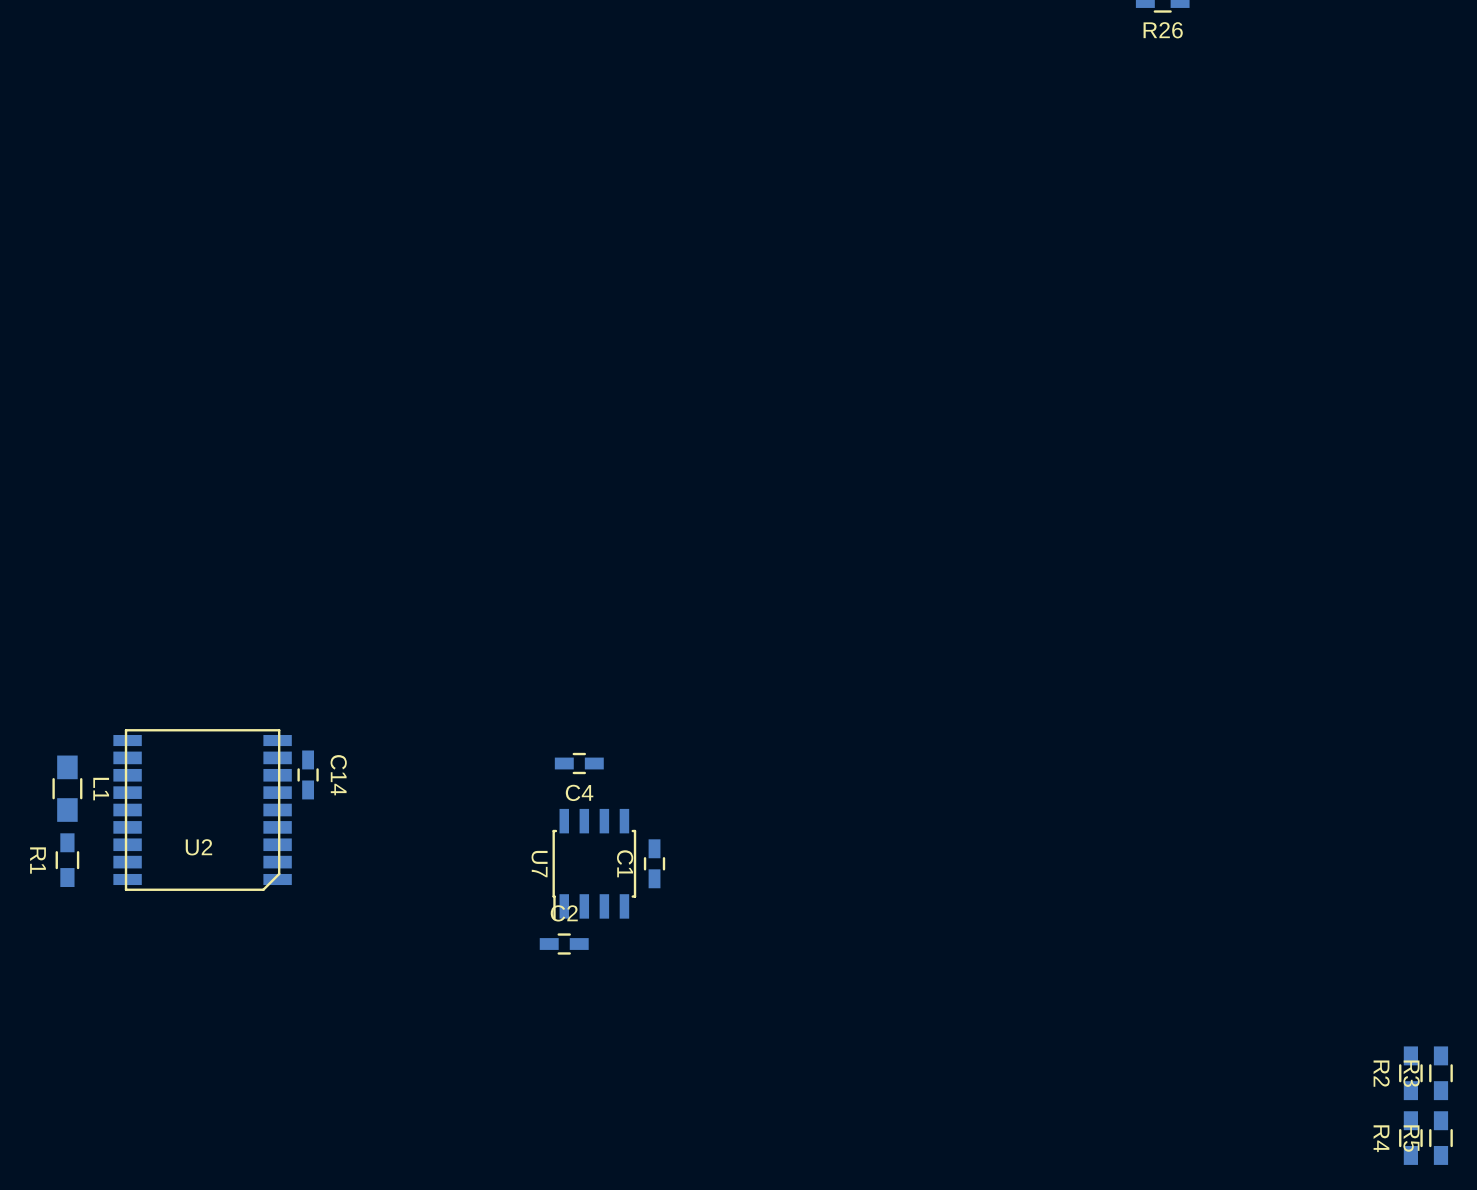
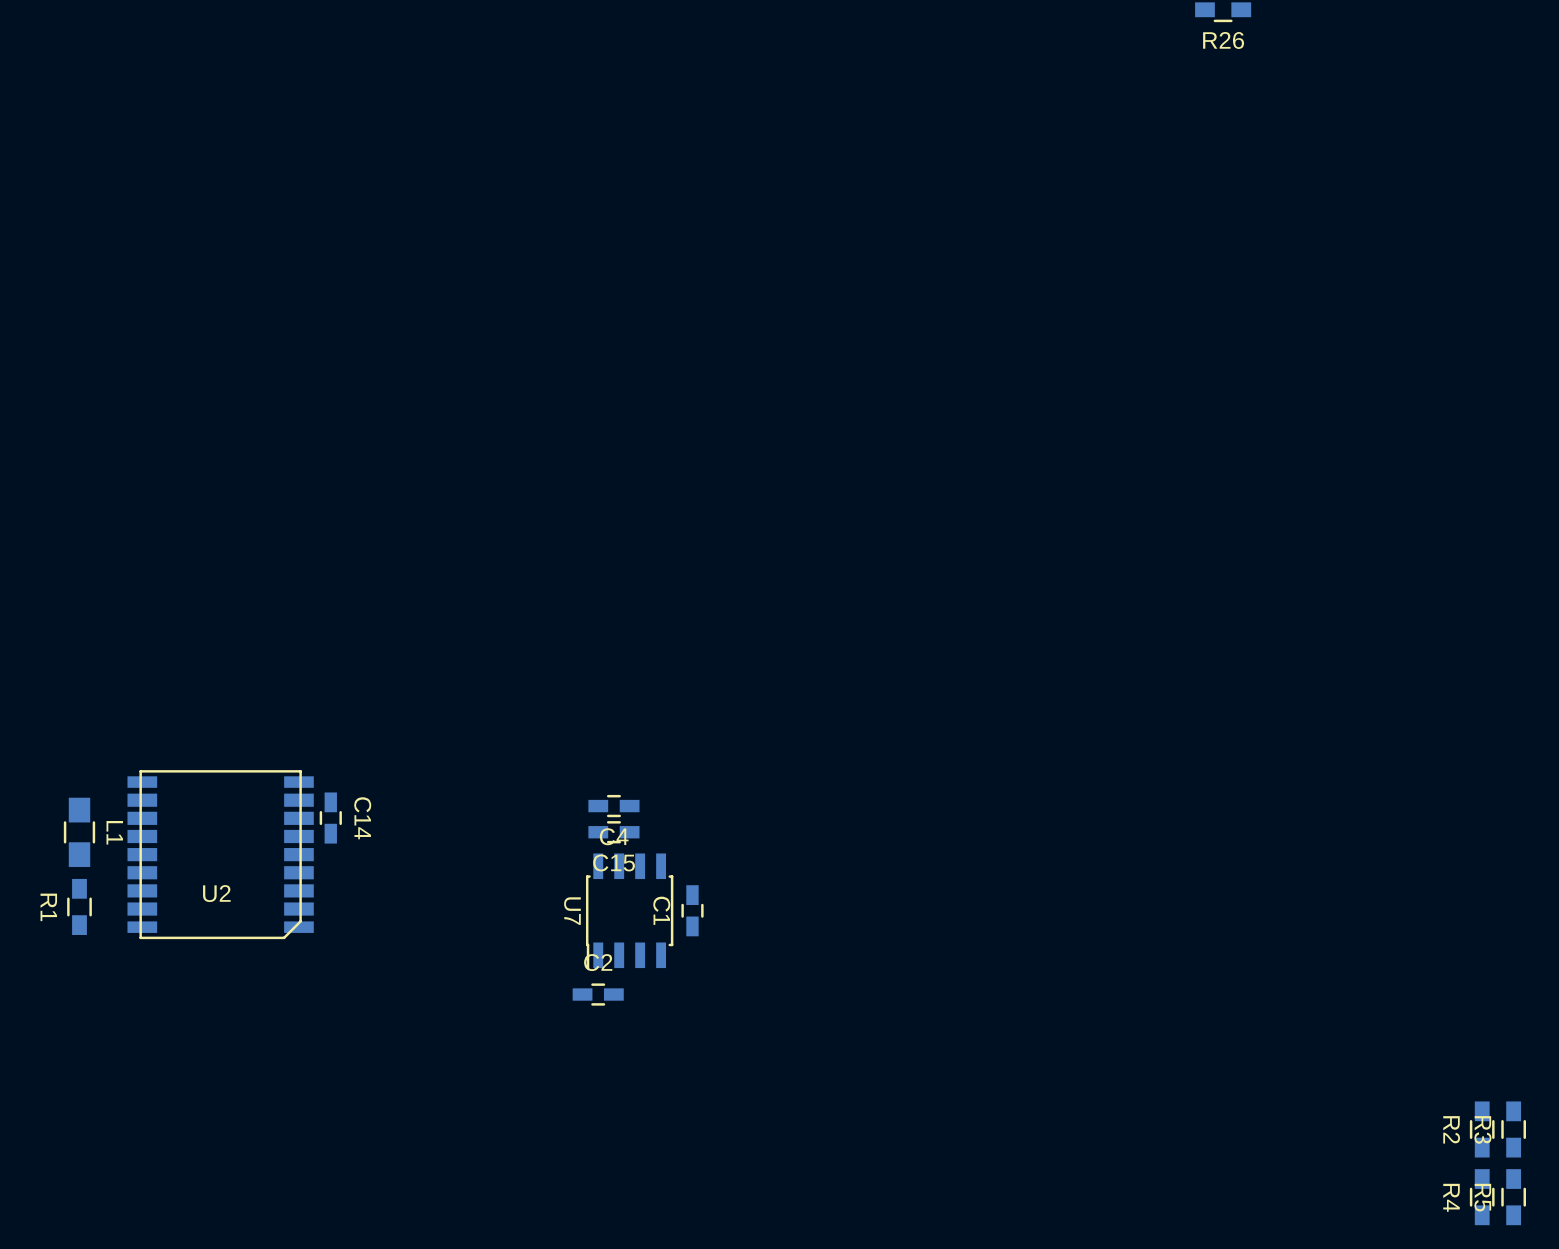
C15: none -> (613, 832)

